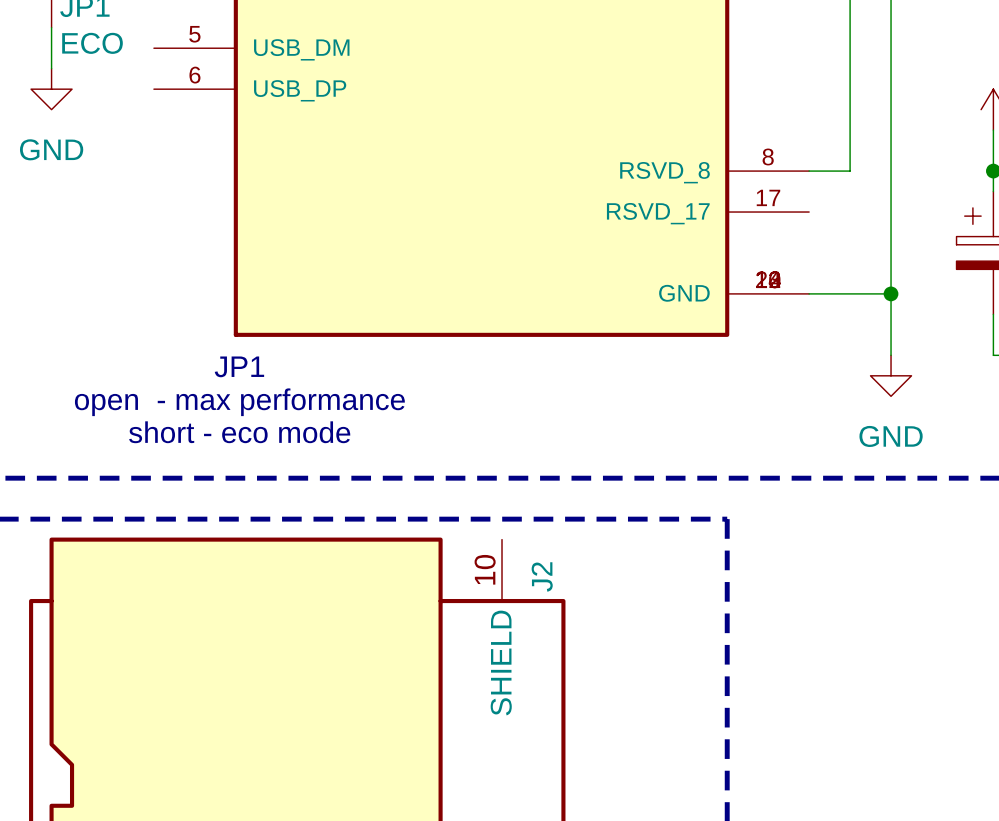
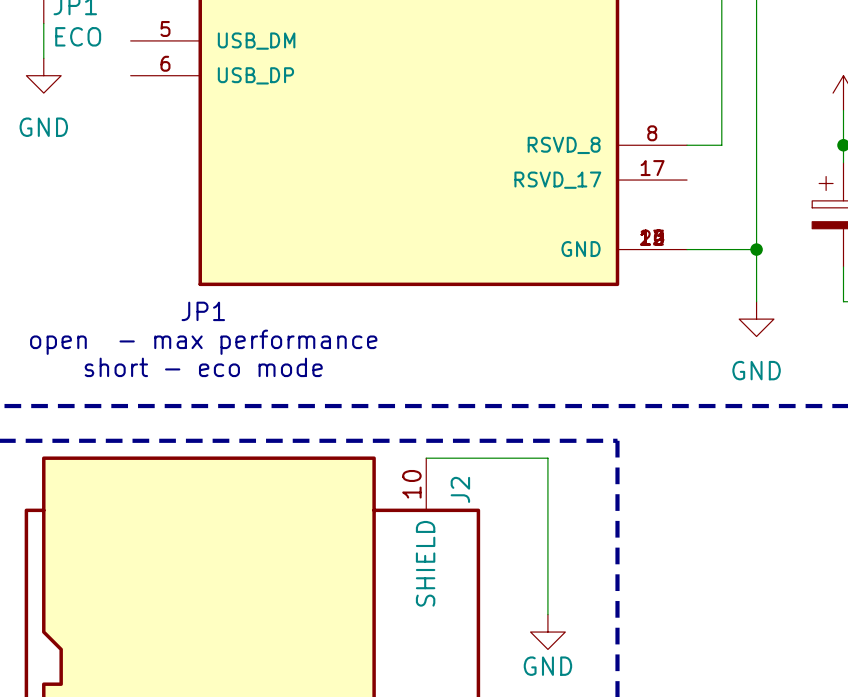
wire: none -> (426, 458) (547, 458) (547, 614)
power symbol: none -> GND (547, 632)

